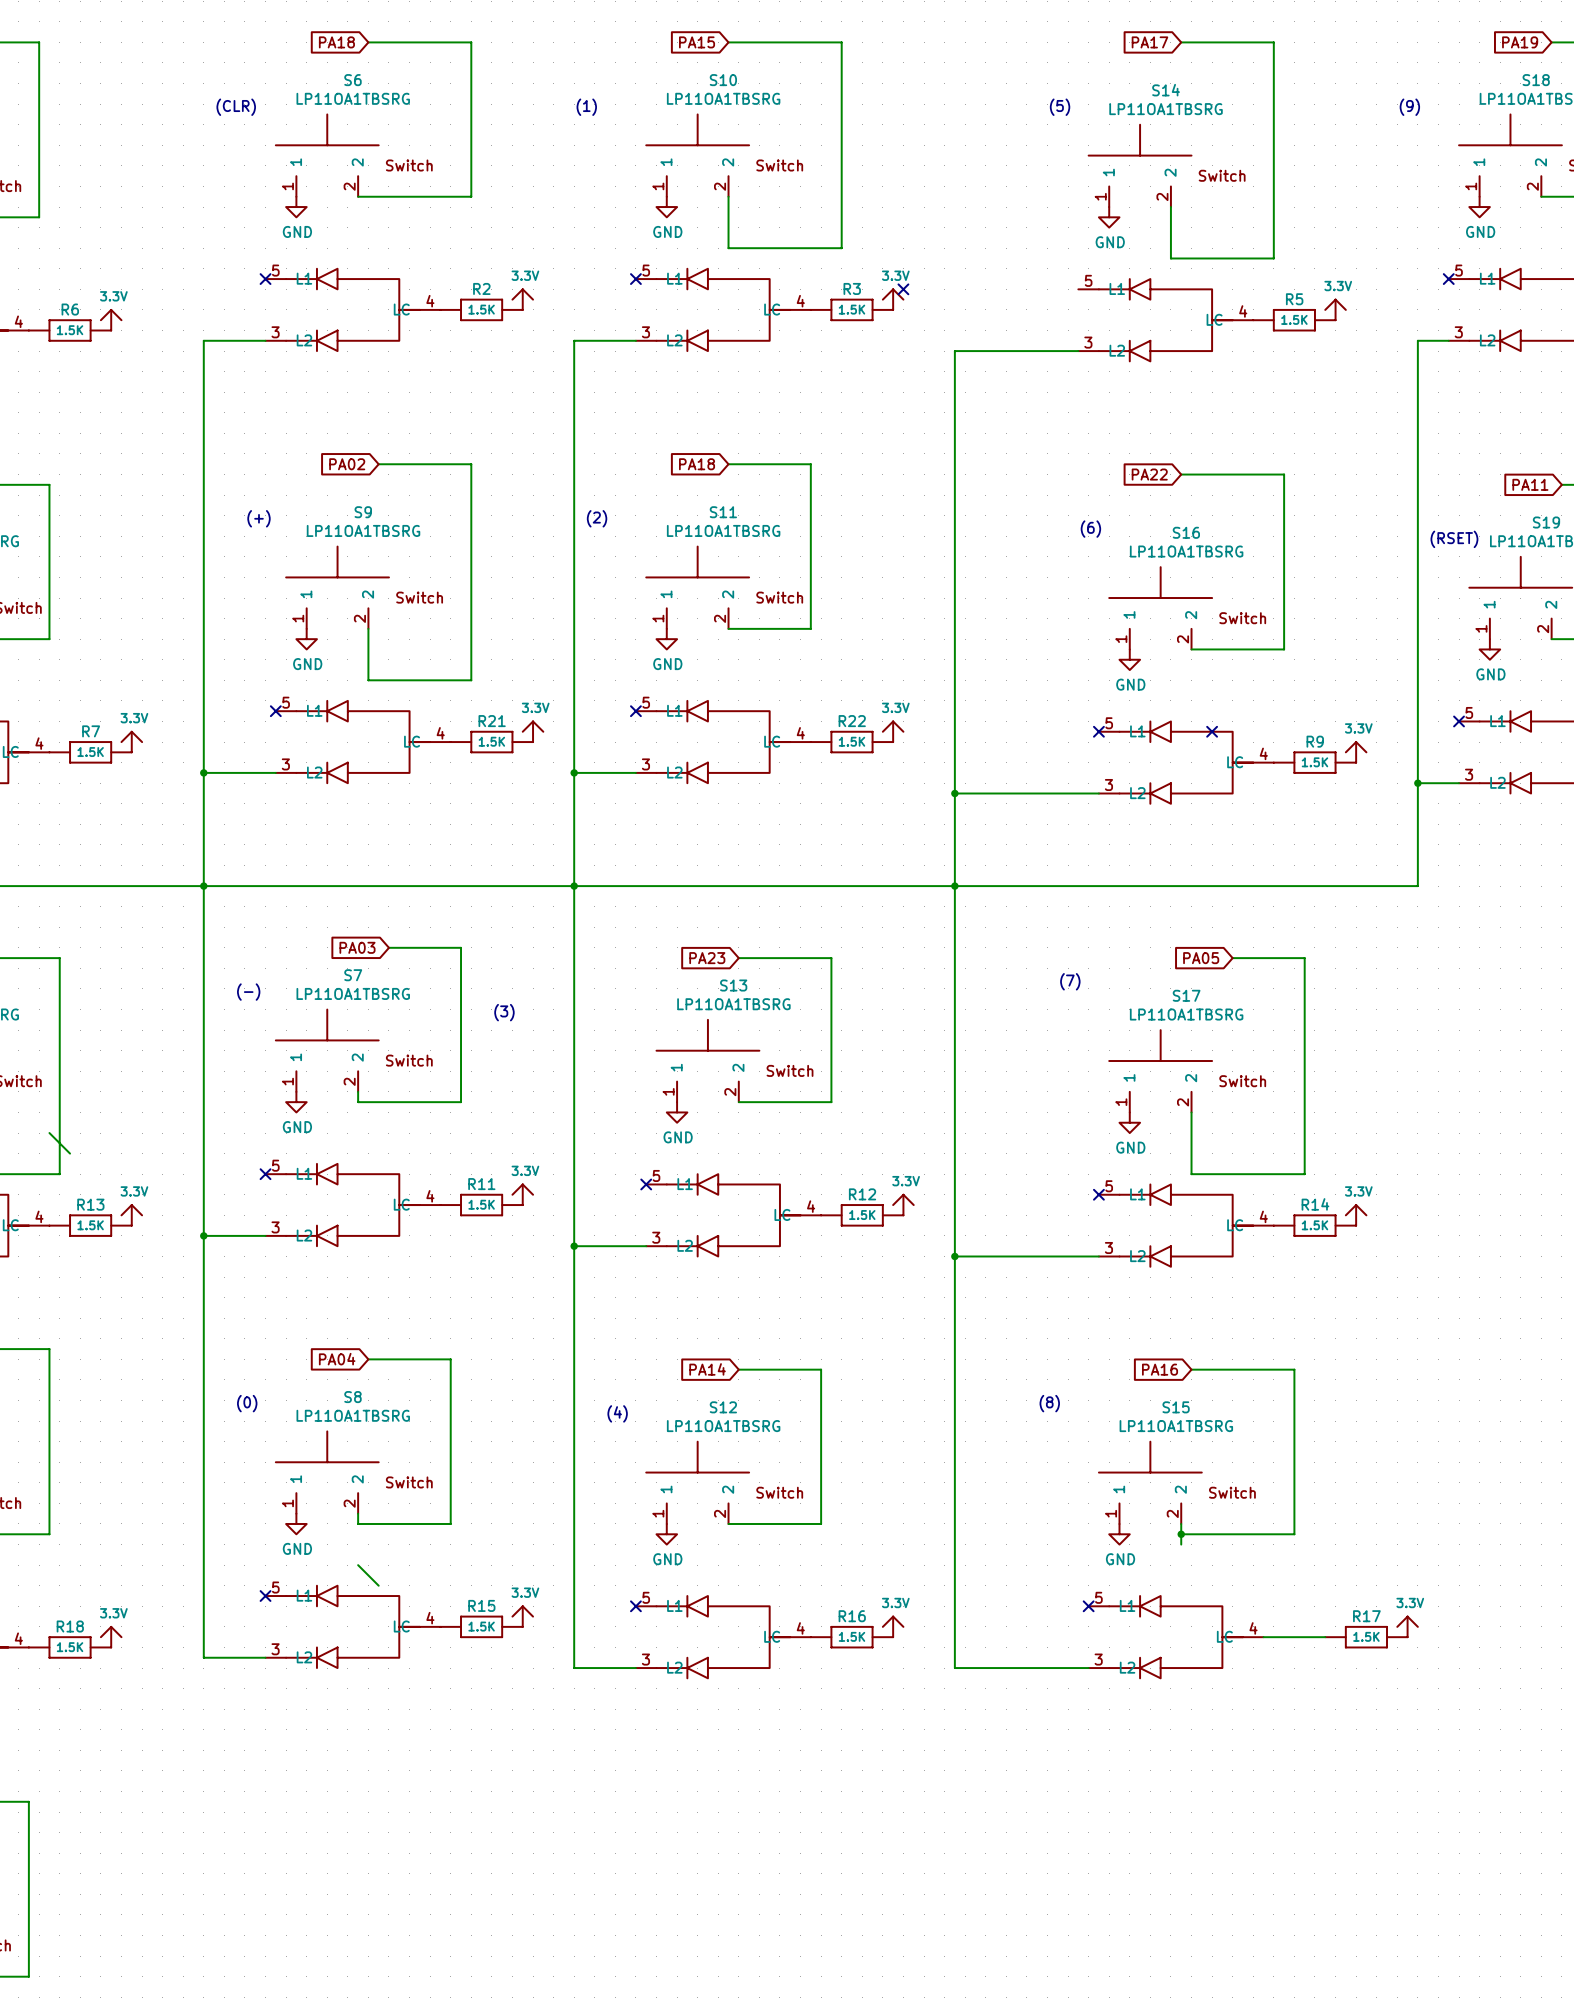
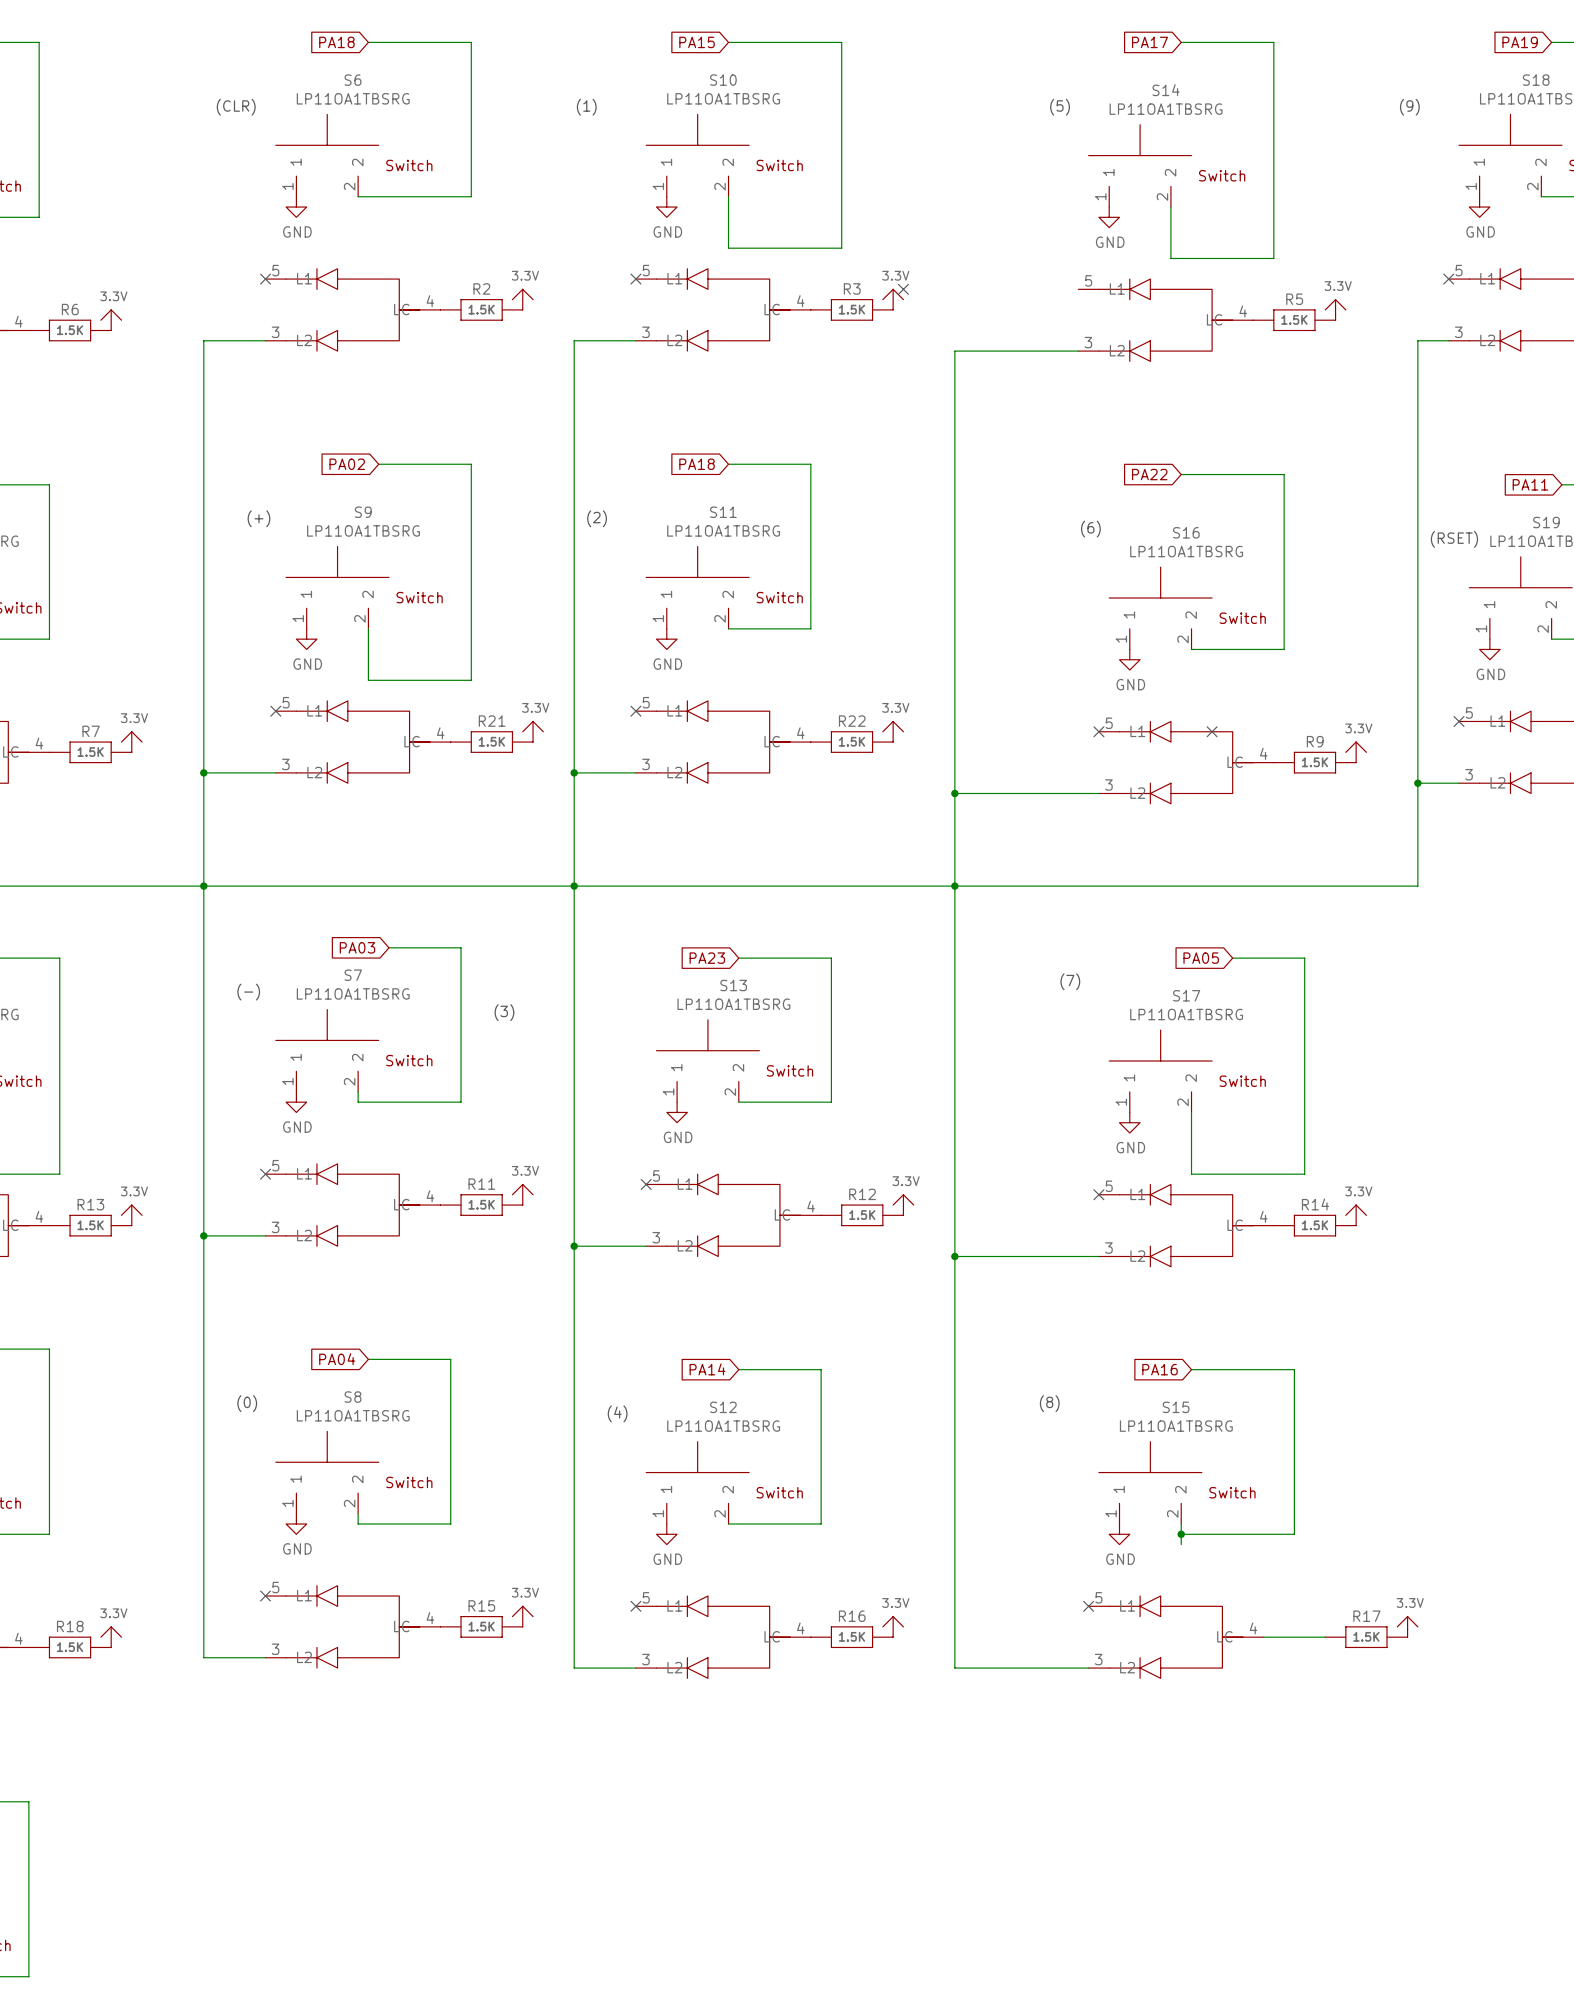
wire: (49, 1133) (70, 1153) -> none
wire: (358, 1565) (378, 1585) -> none

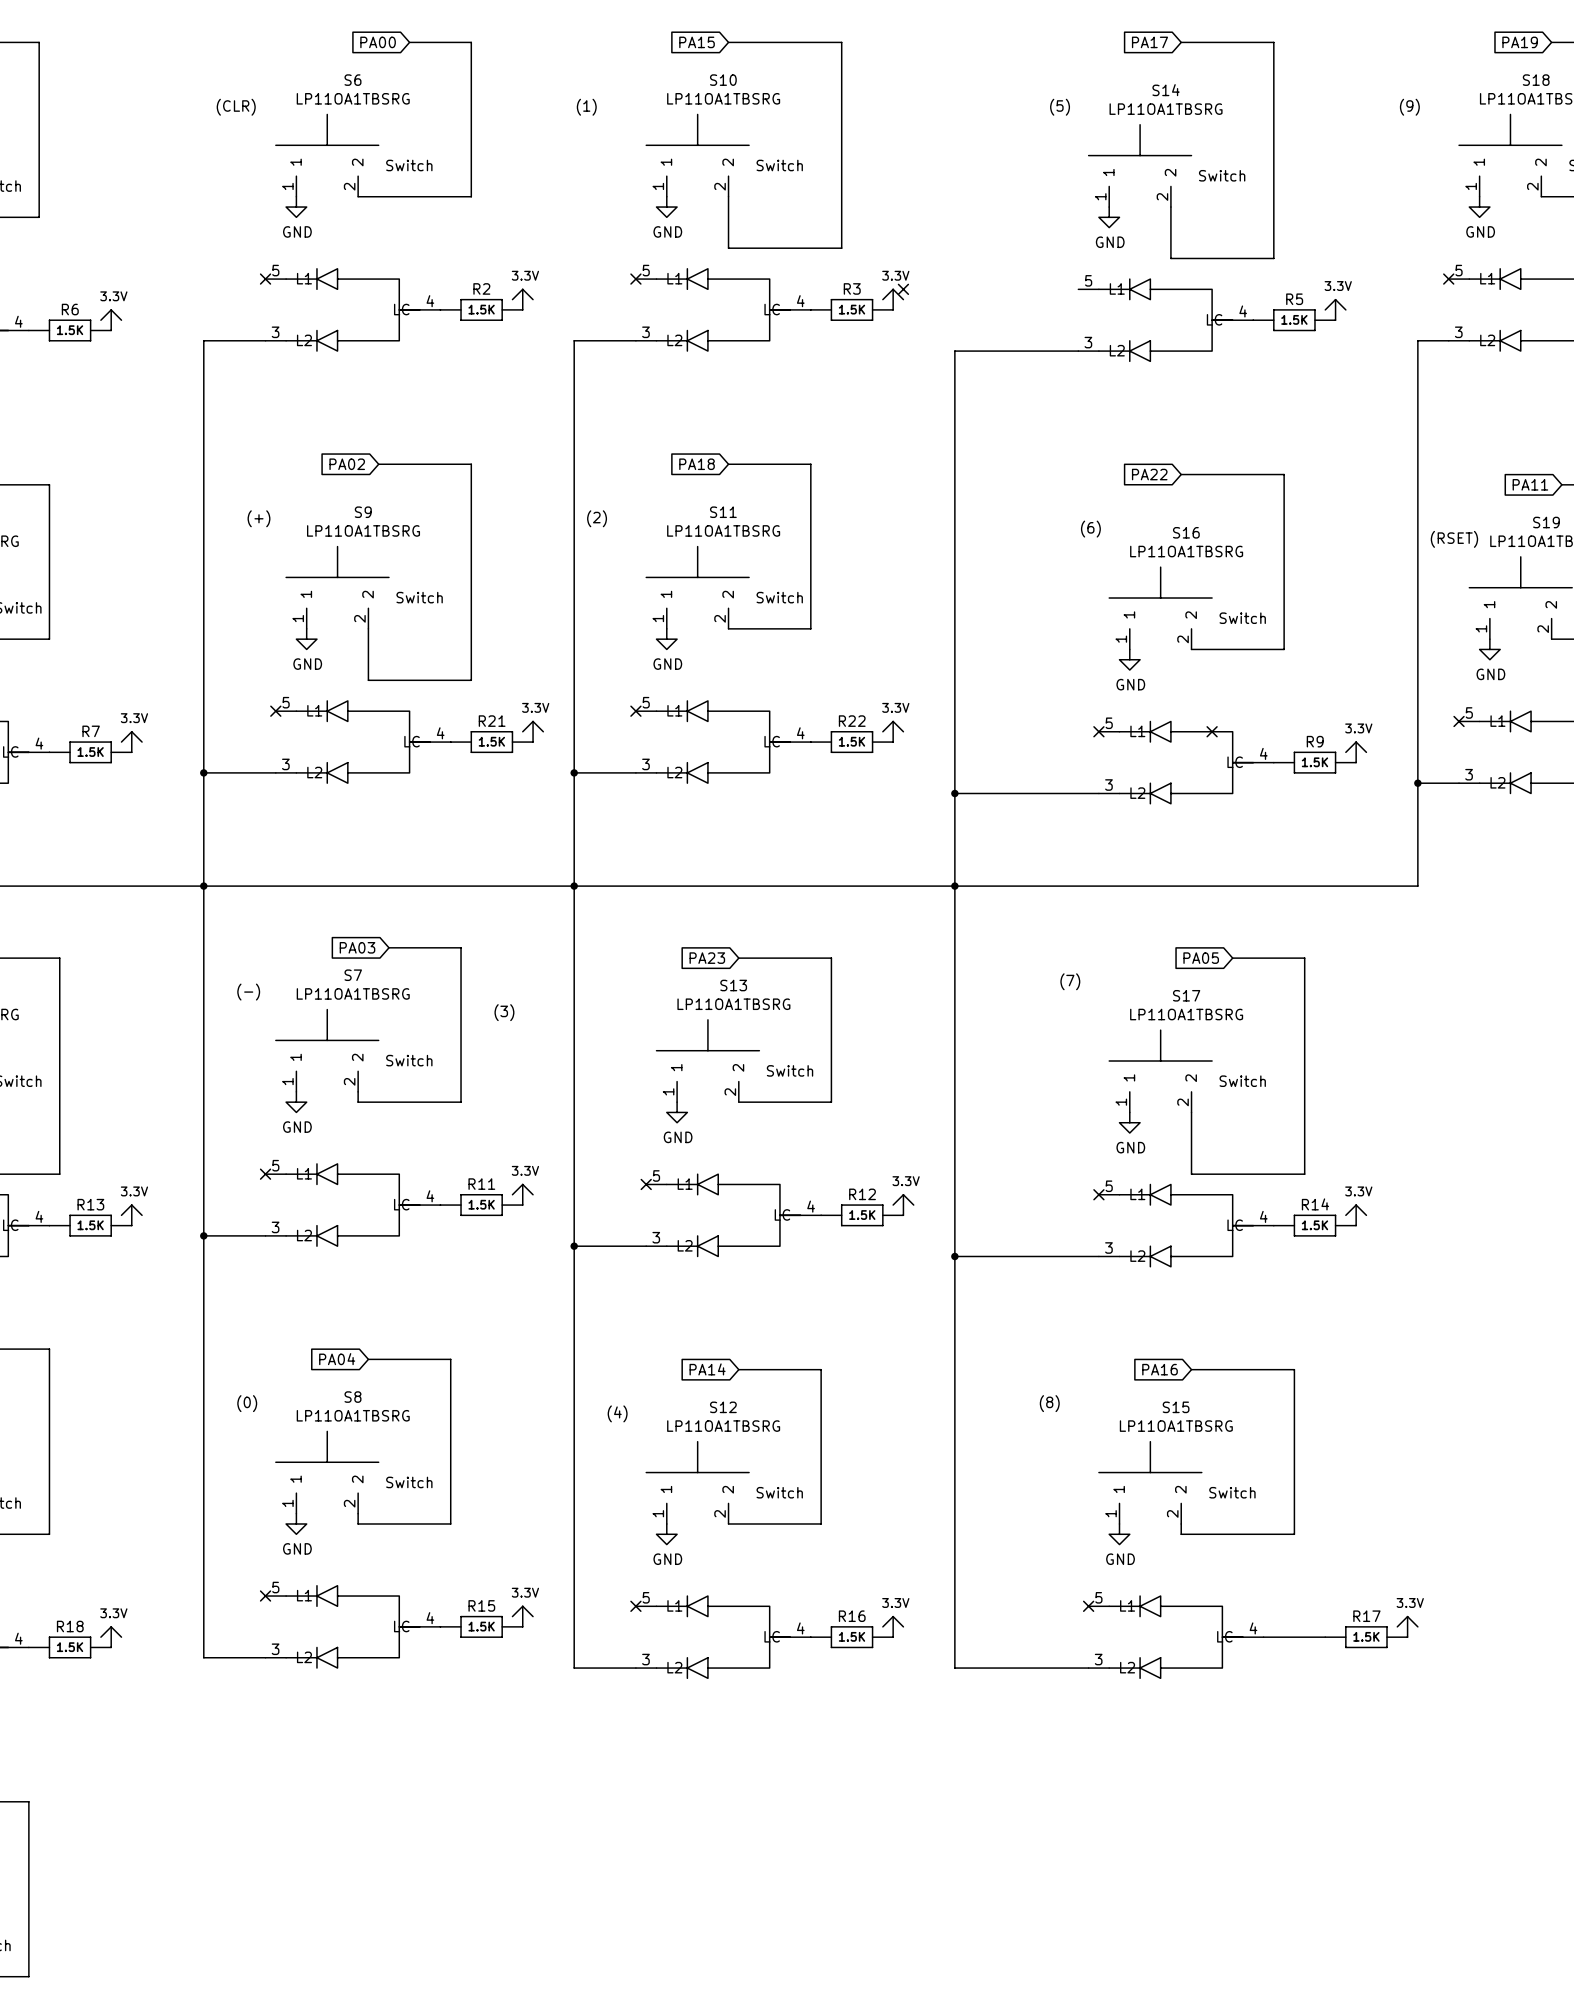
global label: PA18 (336, 42) -> none
wire: (368, 42) (409, 42) -> none
global label: none -> PA00 (378, 42)
wire: (1181, 1534) (1181, 1544) -> none
junction: (1181, 1534) -> none

